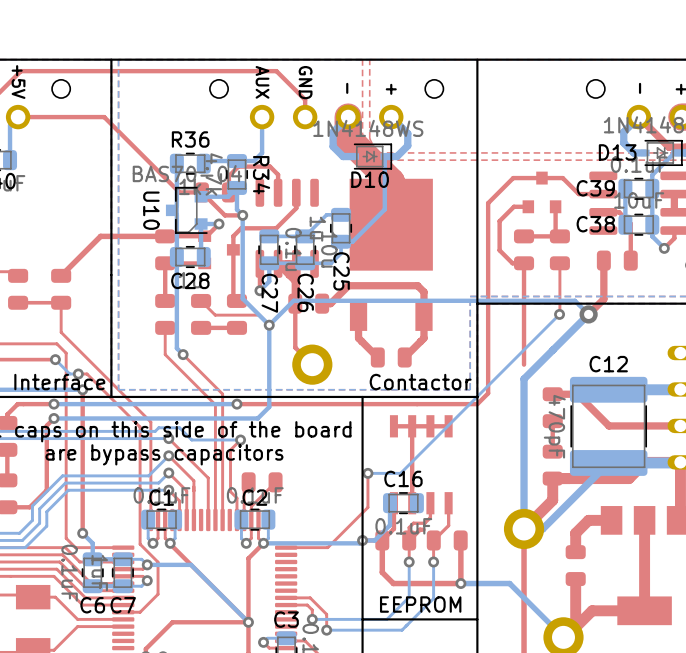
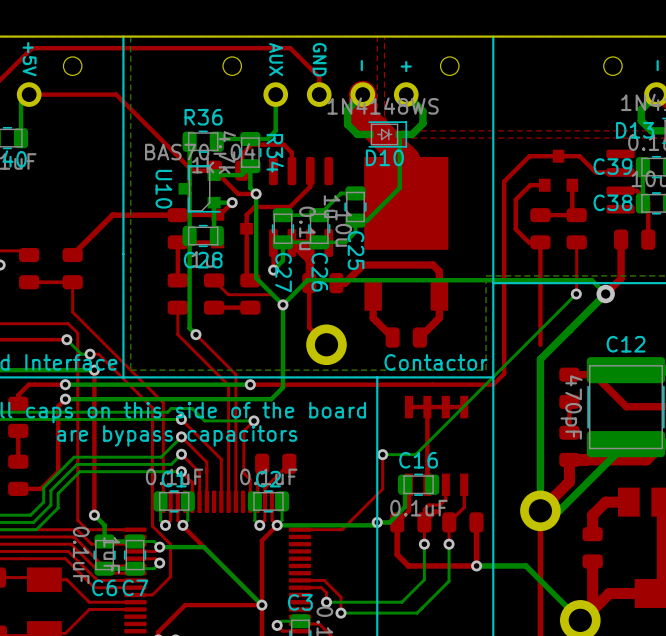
text: EEPROM (420, 604) -> none
line: (477, 619) (362, 619) -> none

